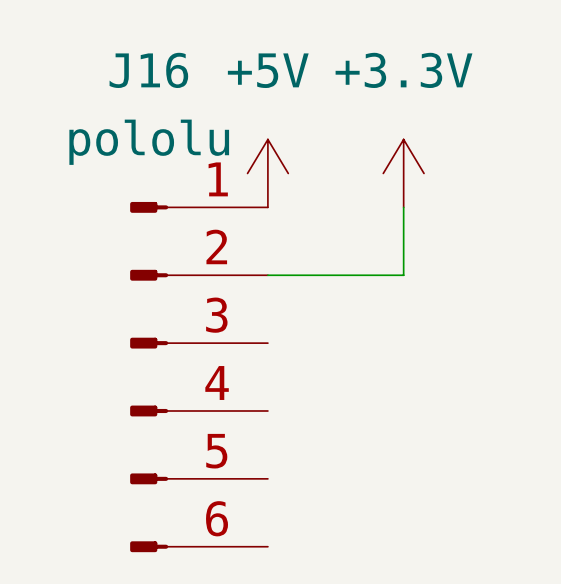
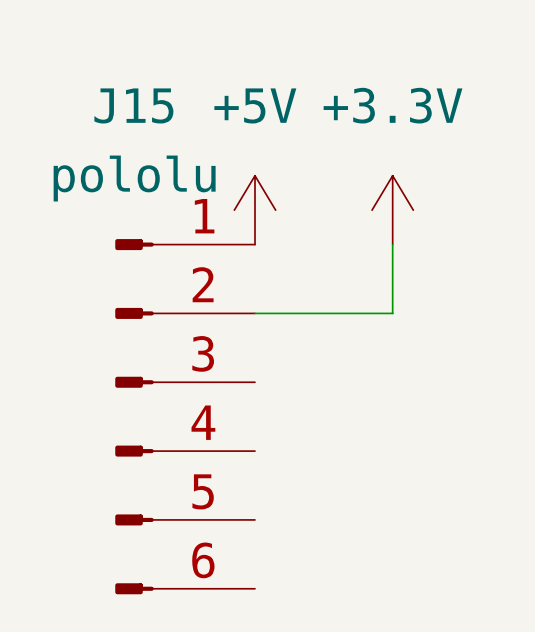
J16 name: J16 (148, 70) -> J15 (133, 105)

